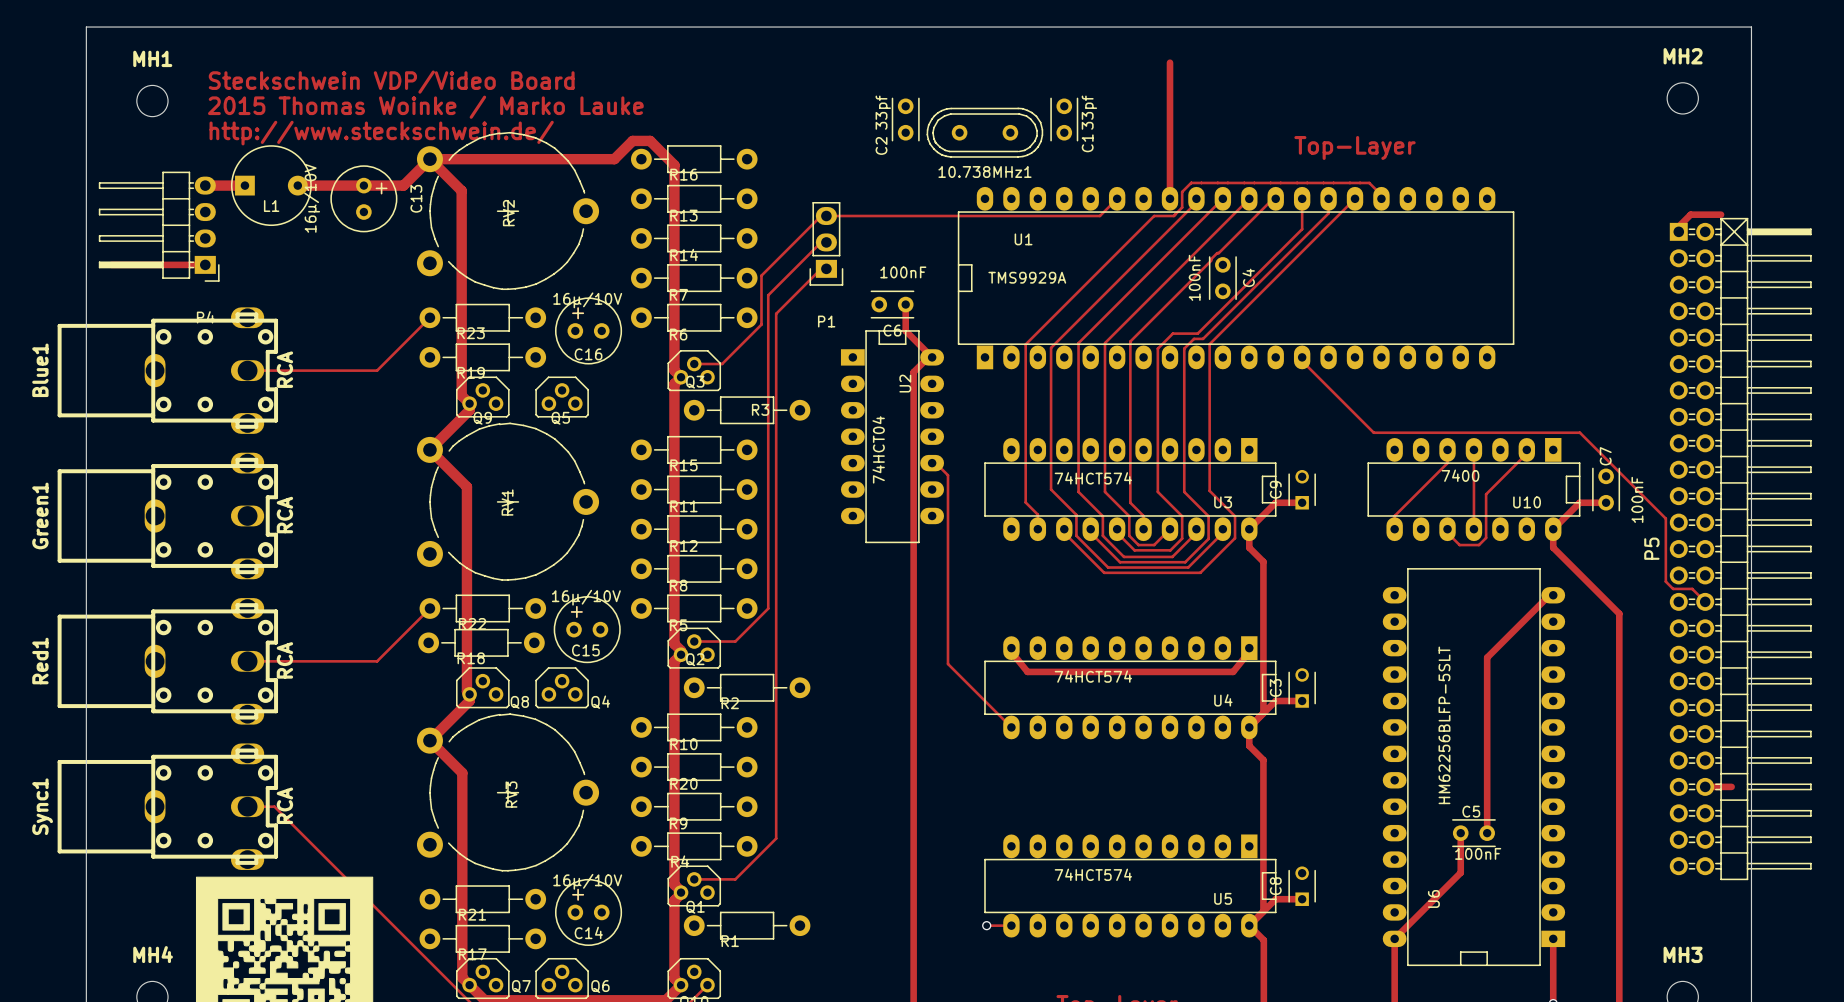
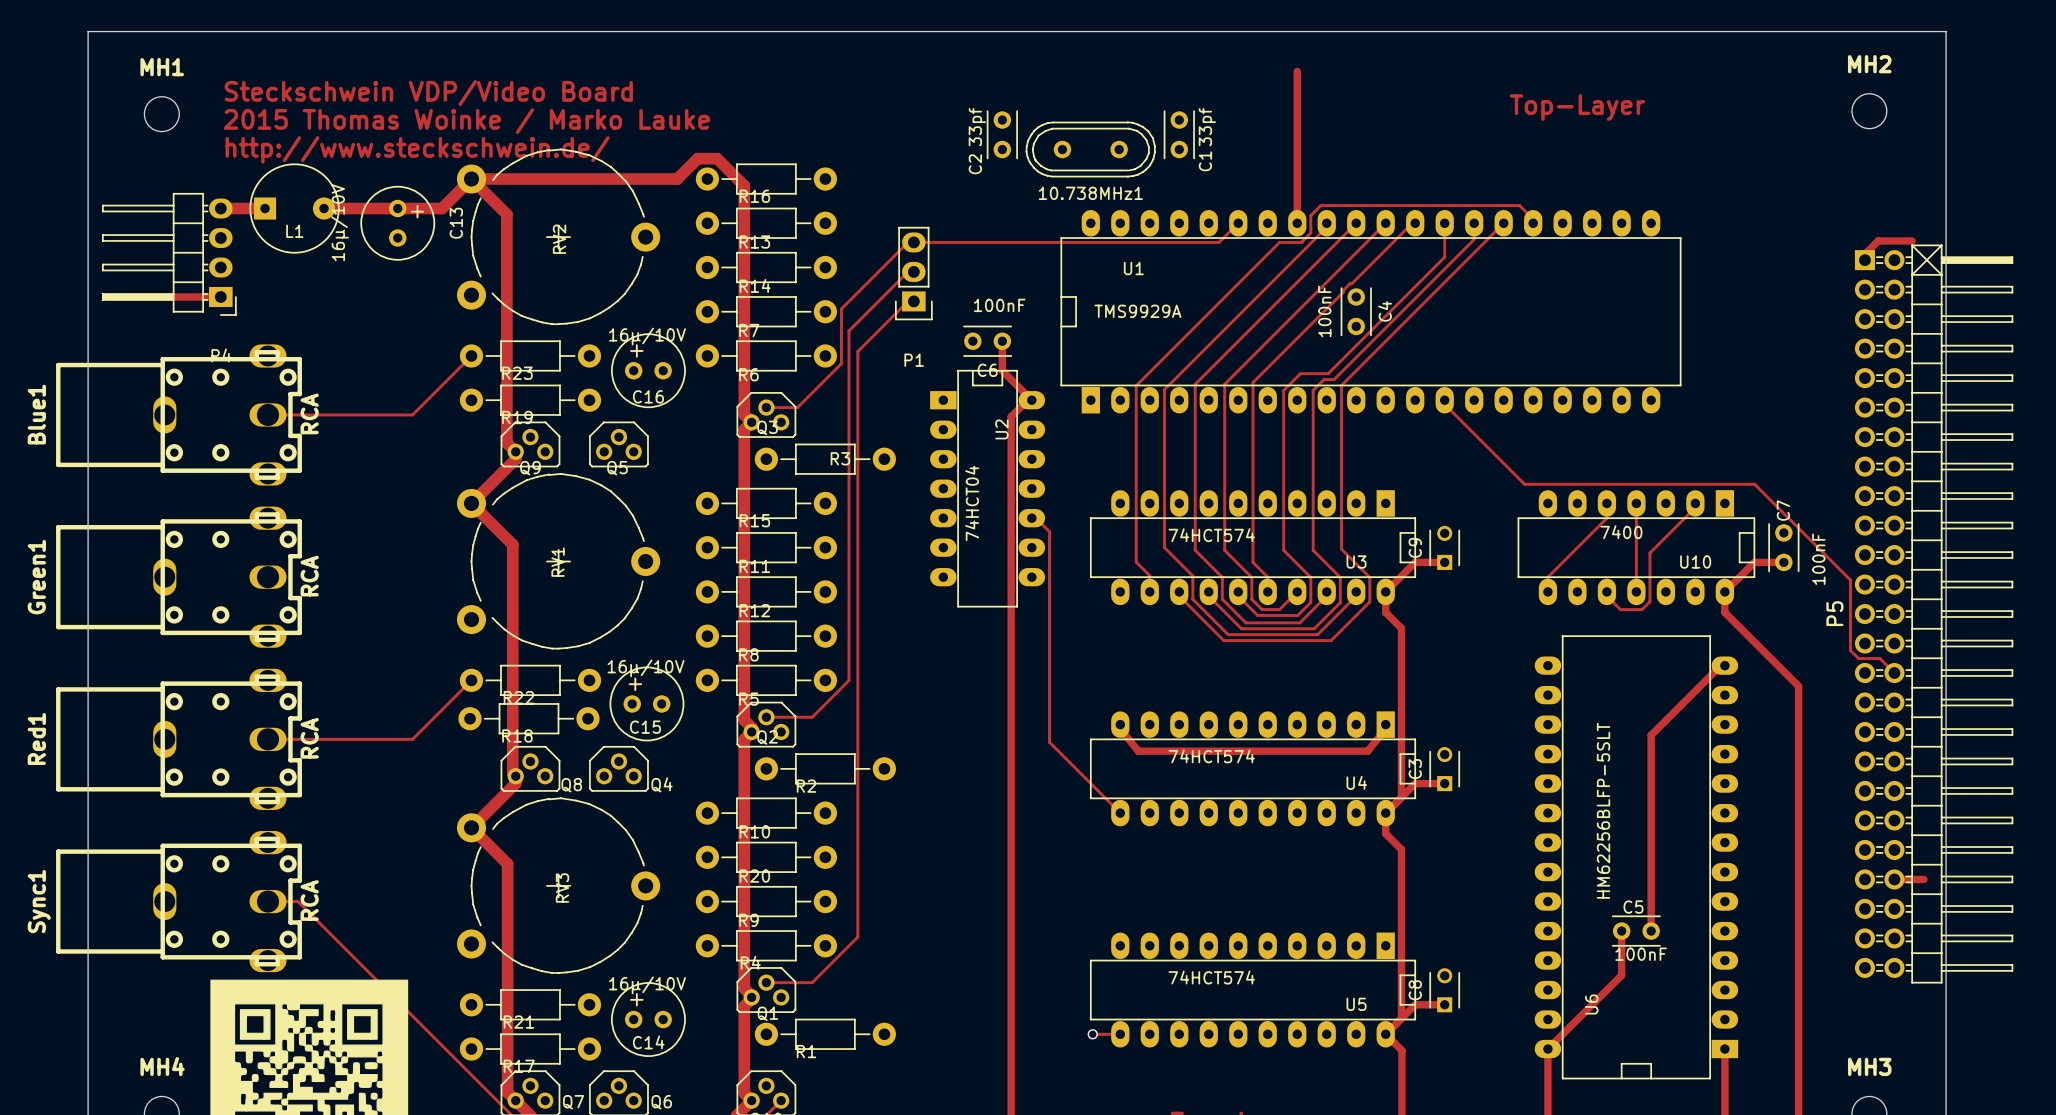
text position: Top-Layer (1355, 147) -> Top-Layer (1577, 107)

